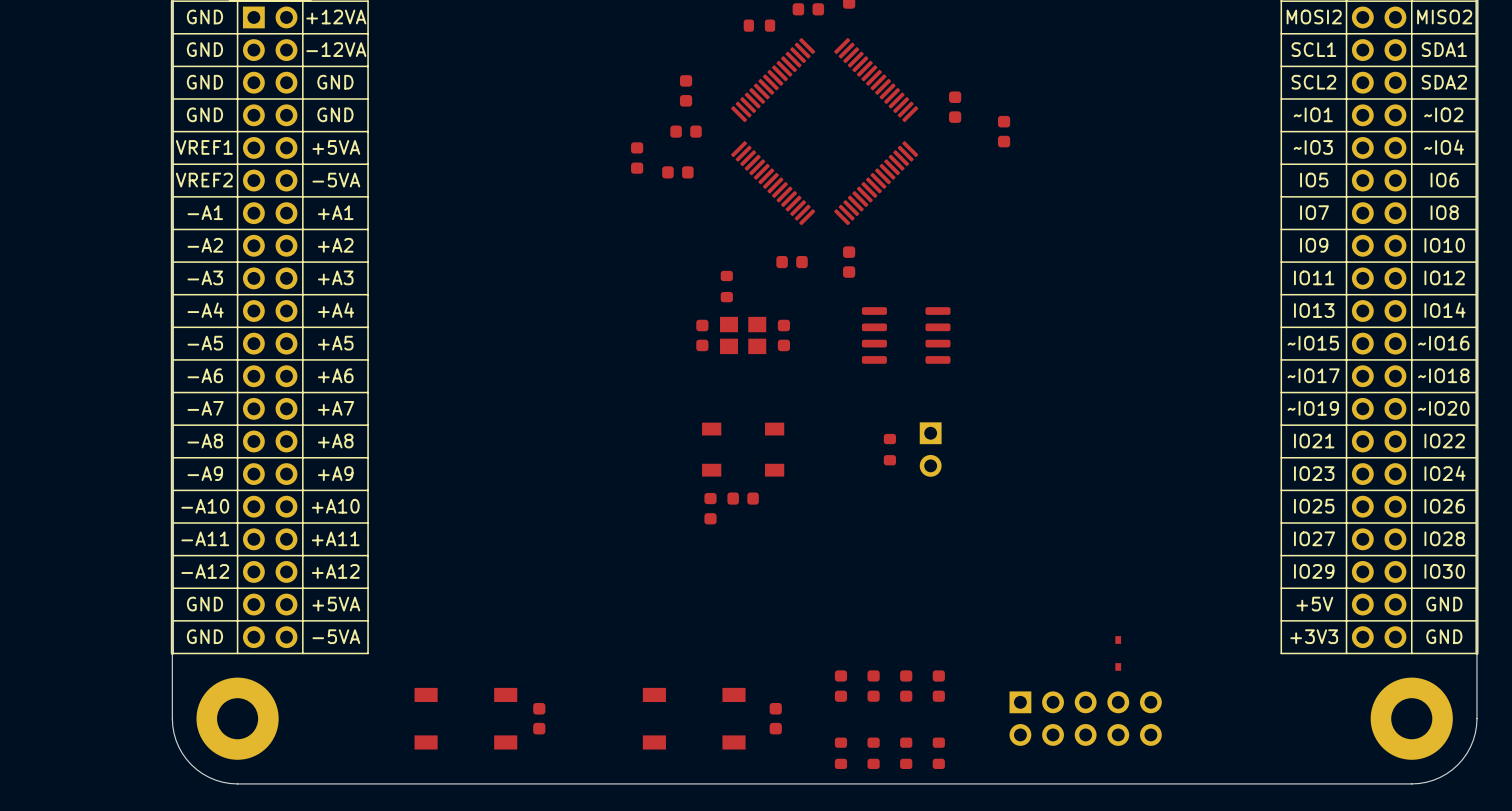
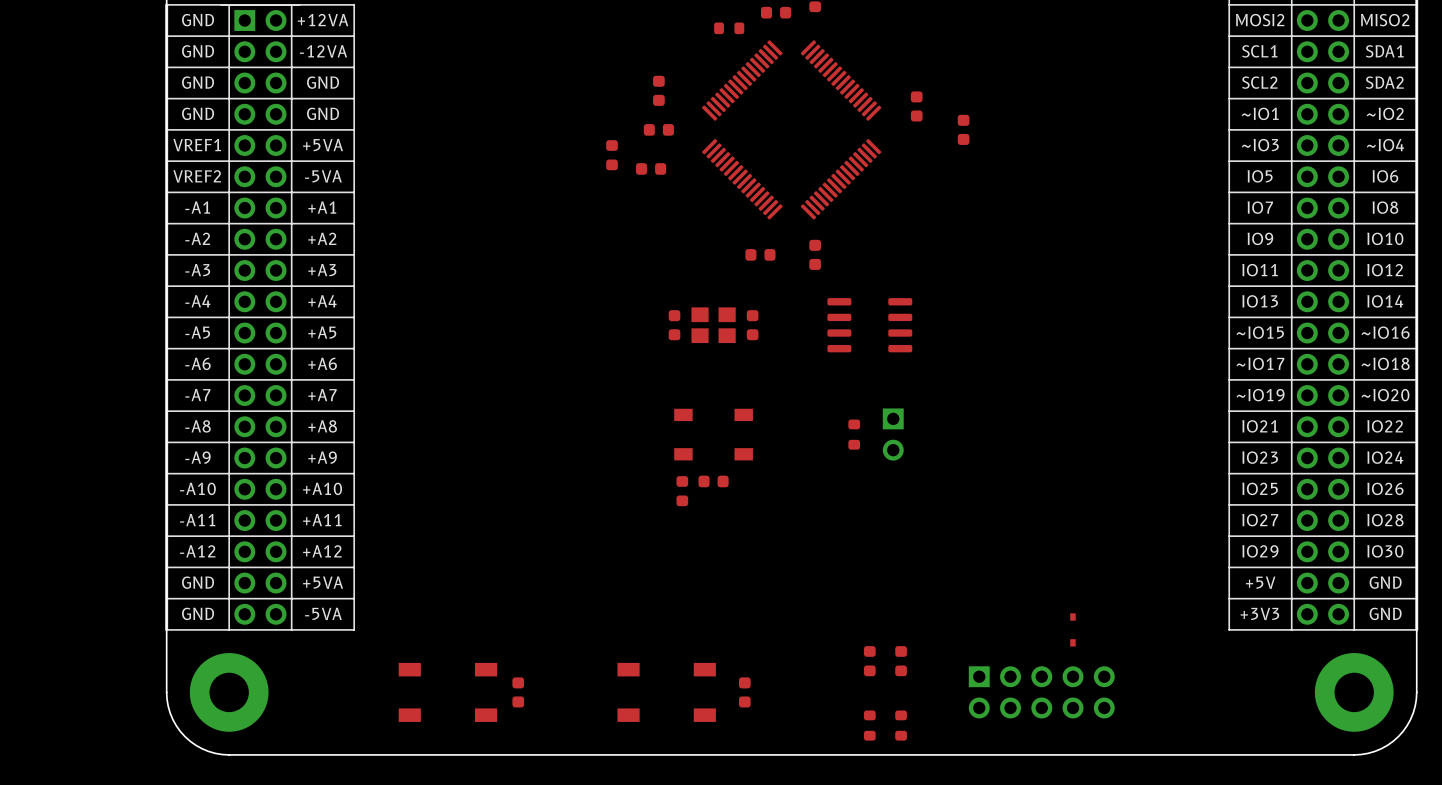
part: (726, 286) -> none
part: (840, 686) -> none
part: (873, 686) -> none
part: (840, 753) -> none
part: (873, 753) -> none

